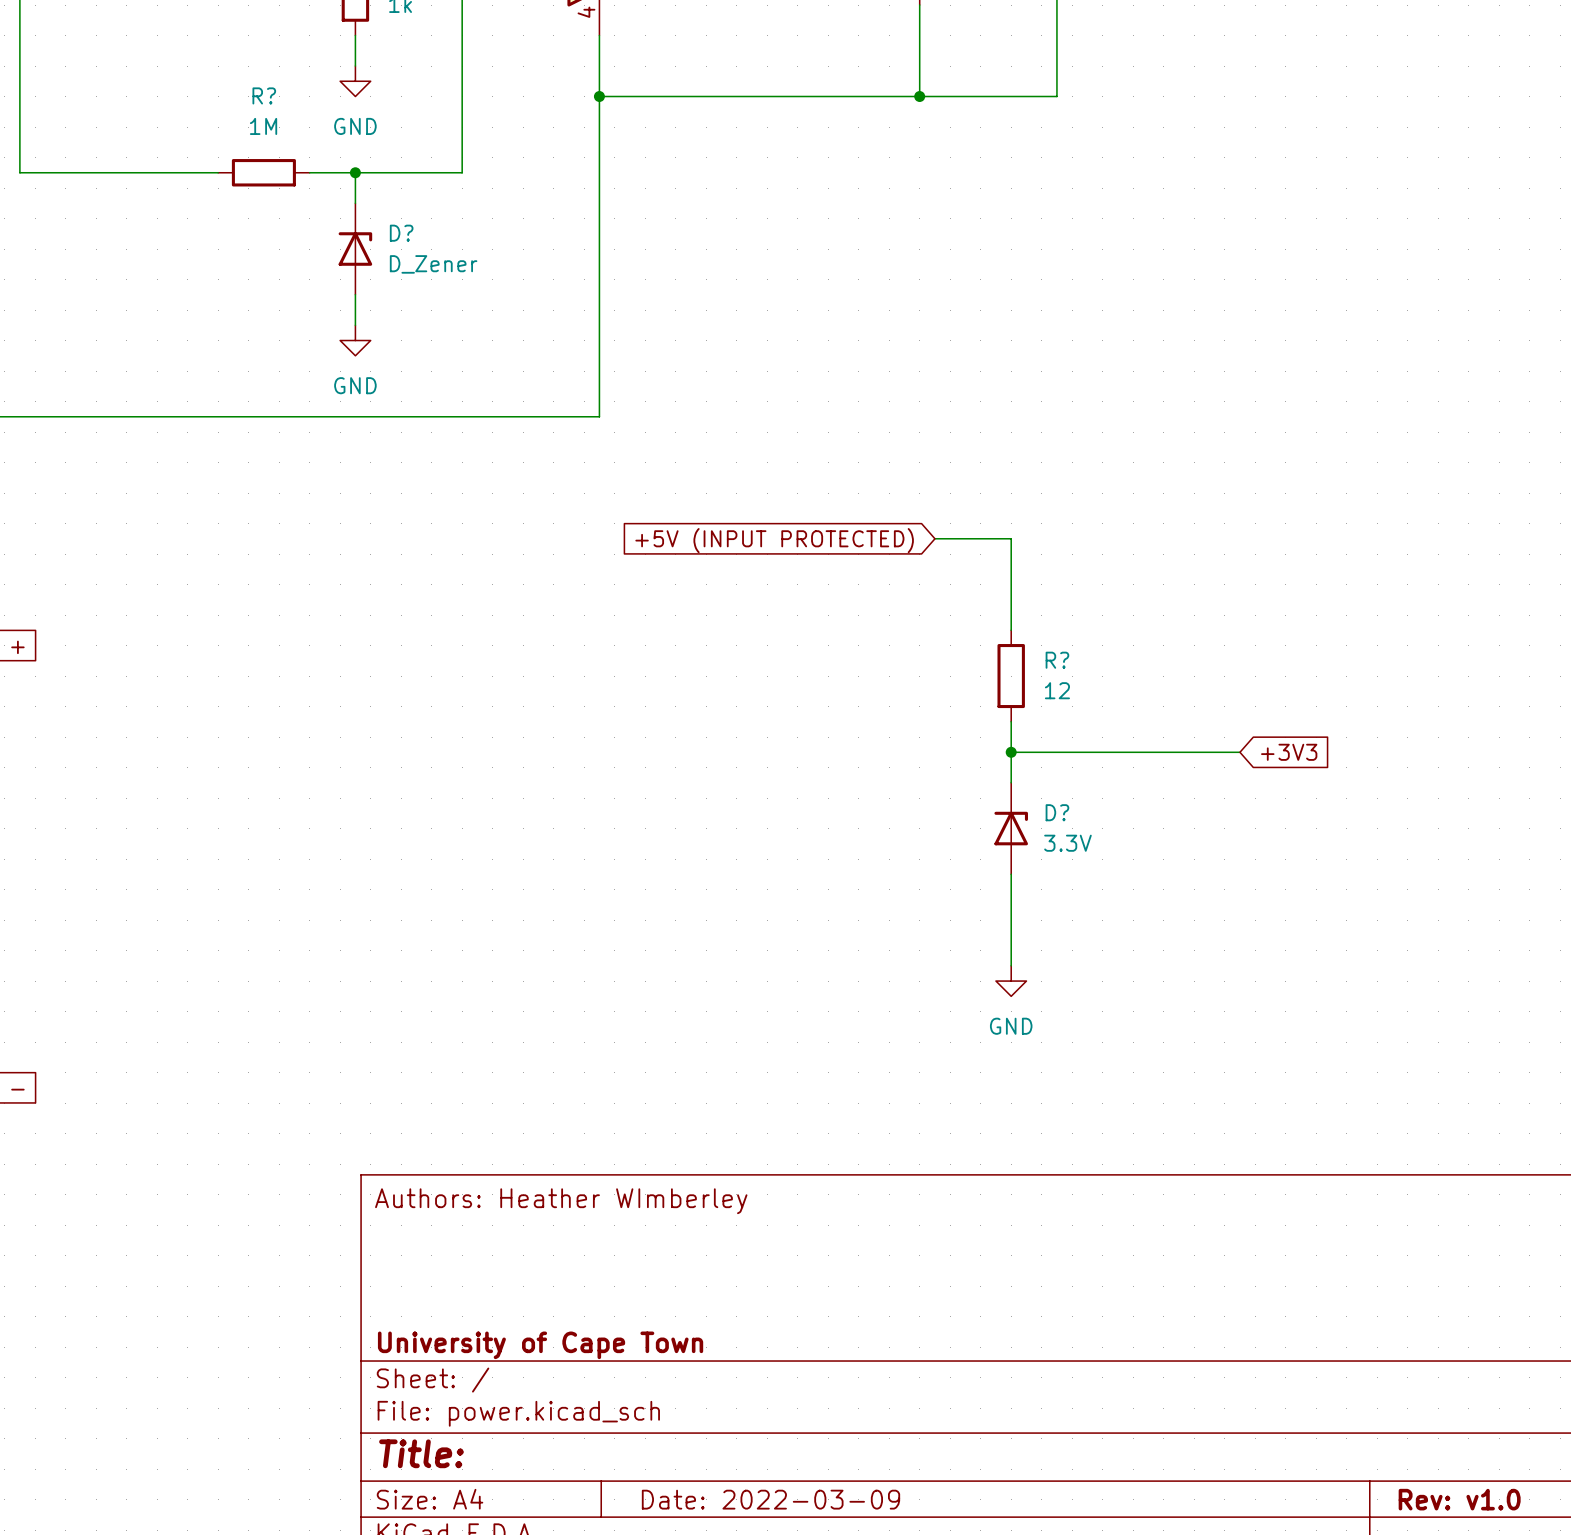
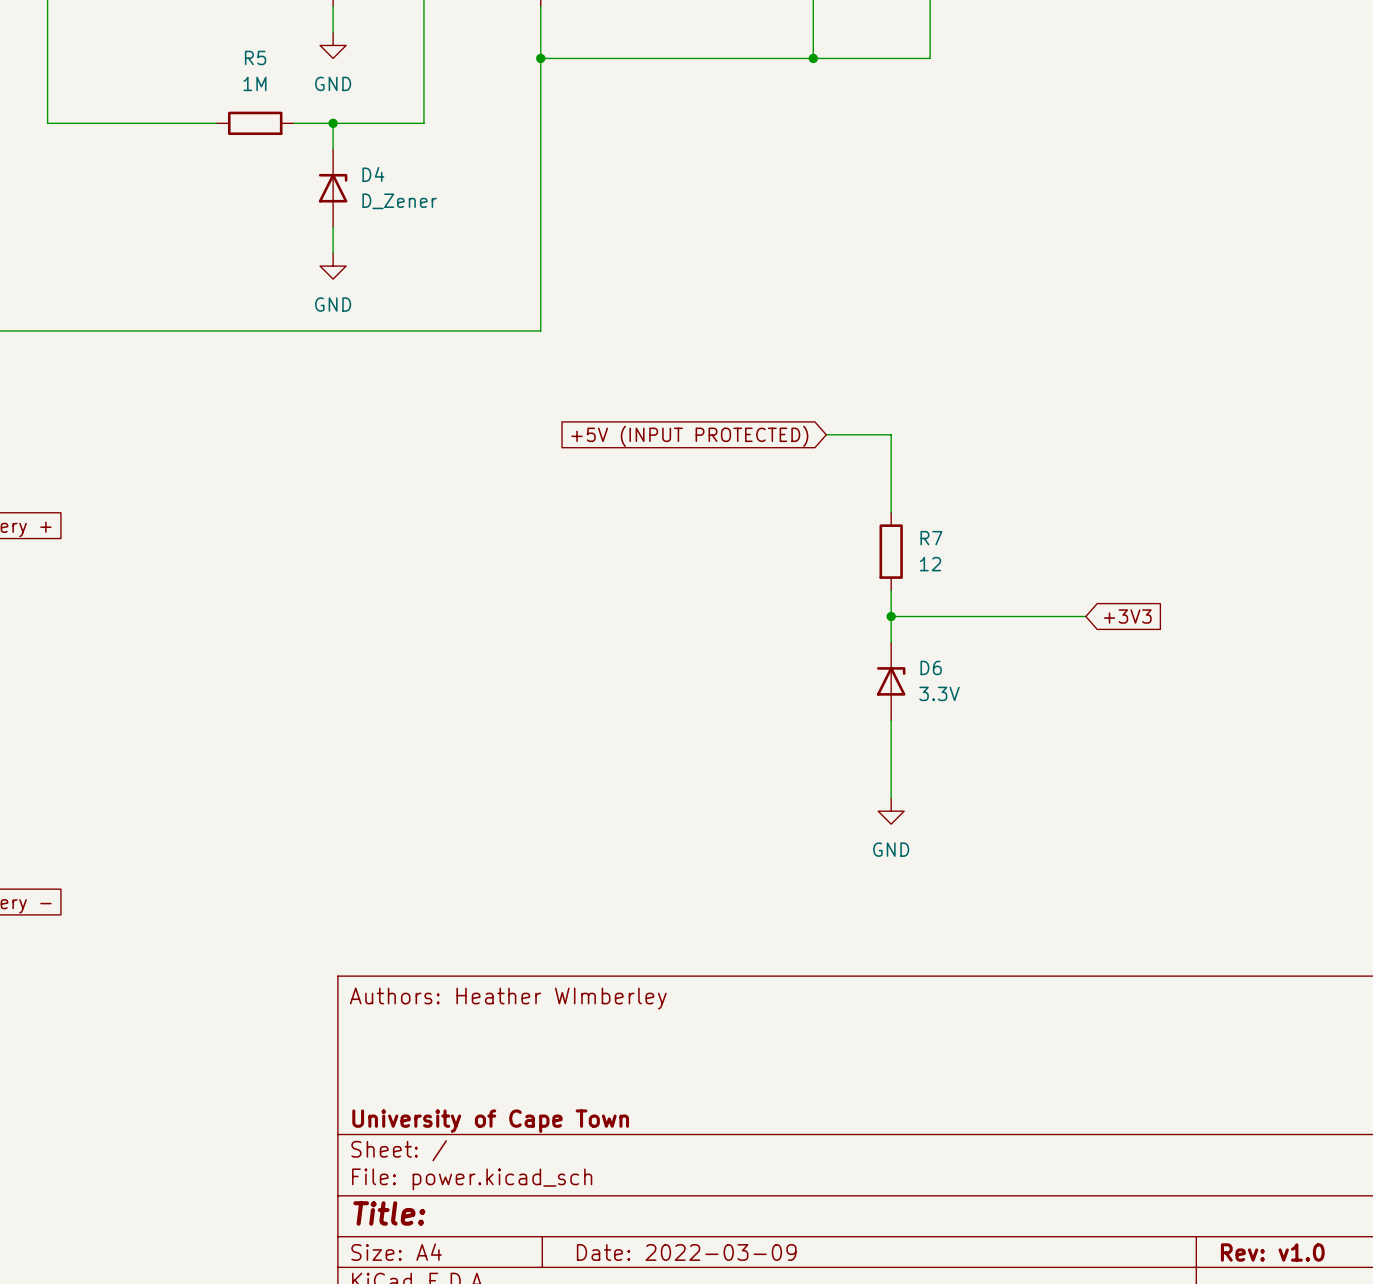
R? name: R? (264, 95) -> R5 (255, 57)
D? name: D? (401, 233) -> D4 (373, 174)
R? name: R? (1057, 660) -> R7 (931, 538)
D? name: D? (1057, 812) -> D6 (931, 667)

